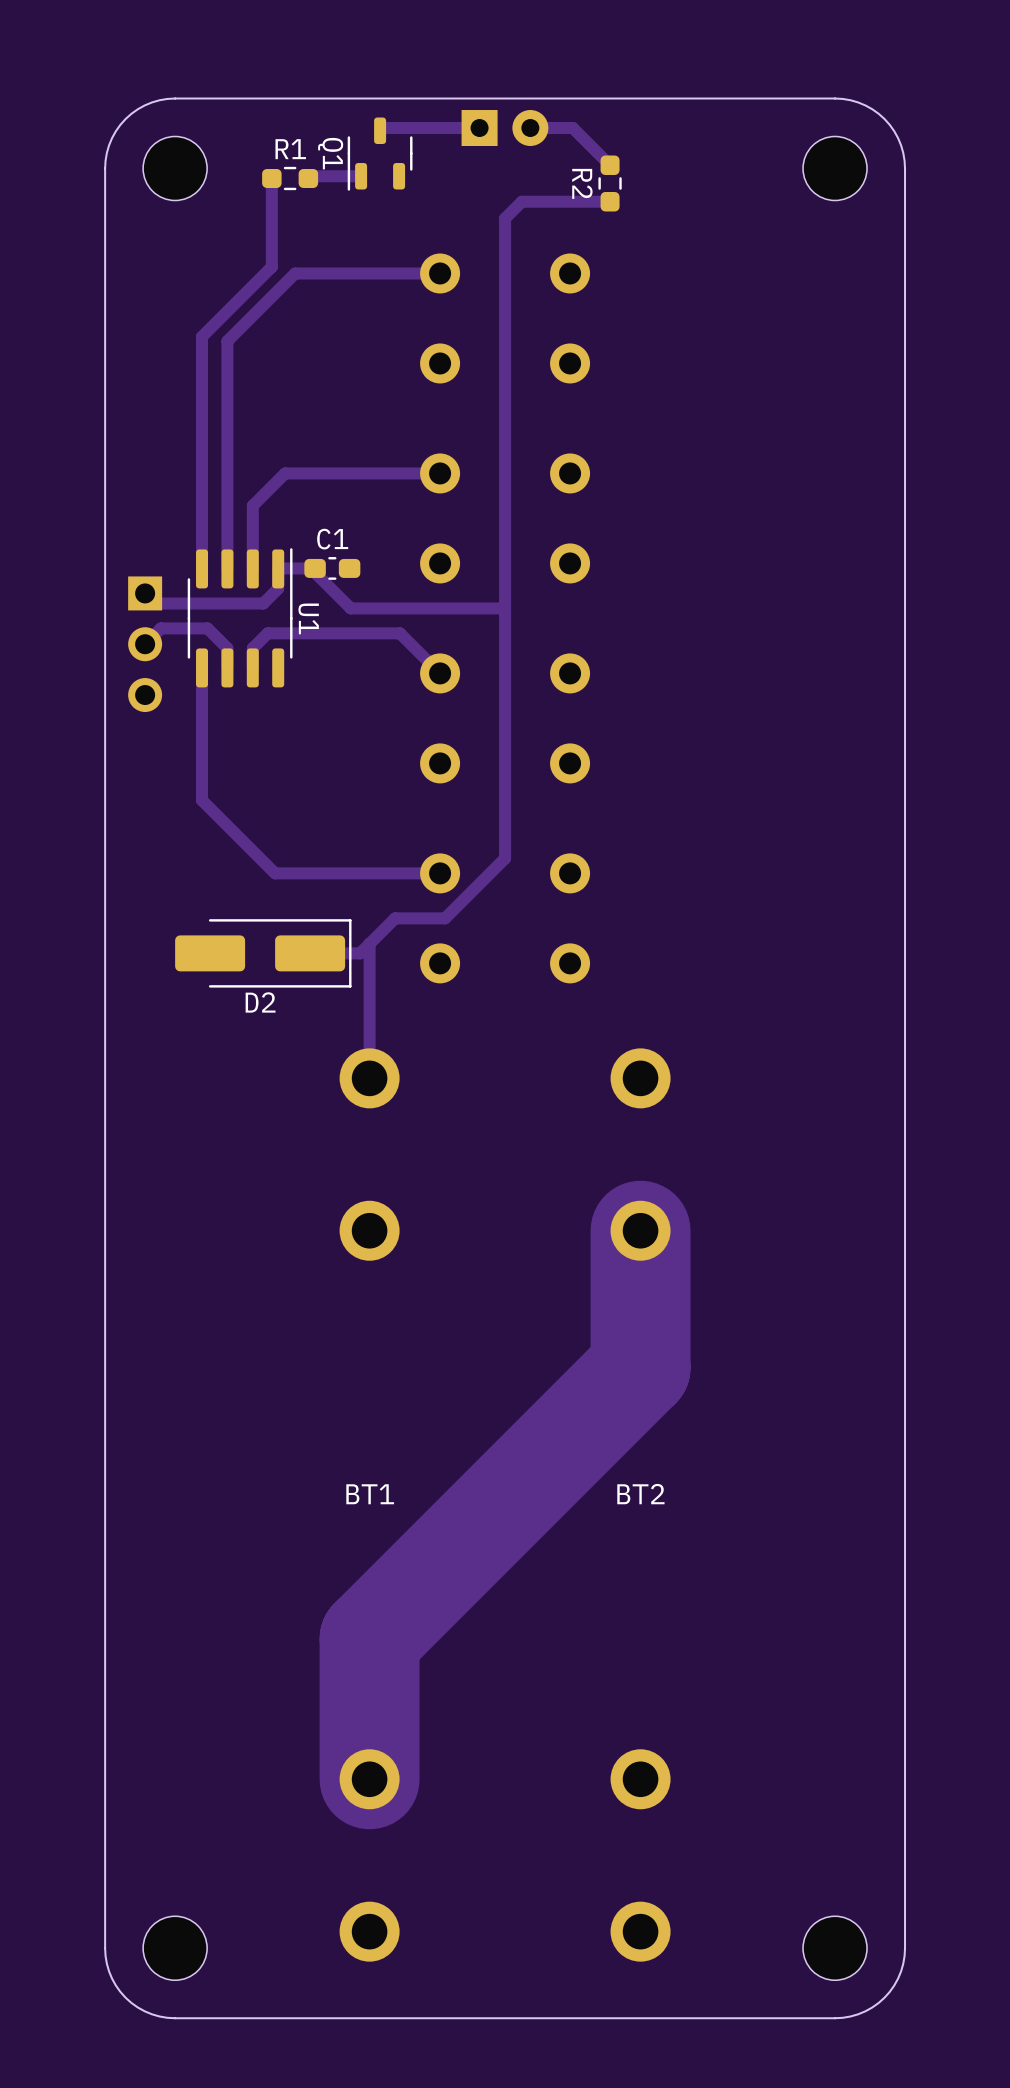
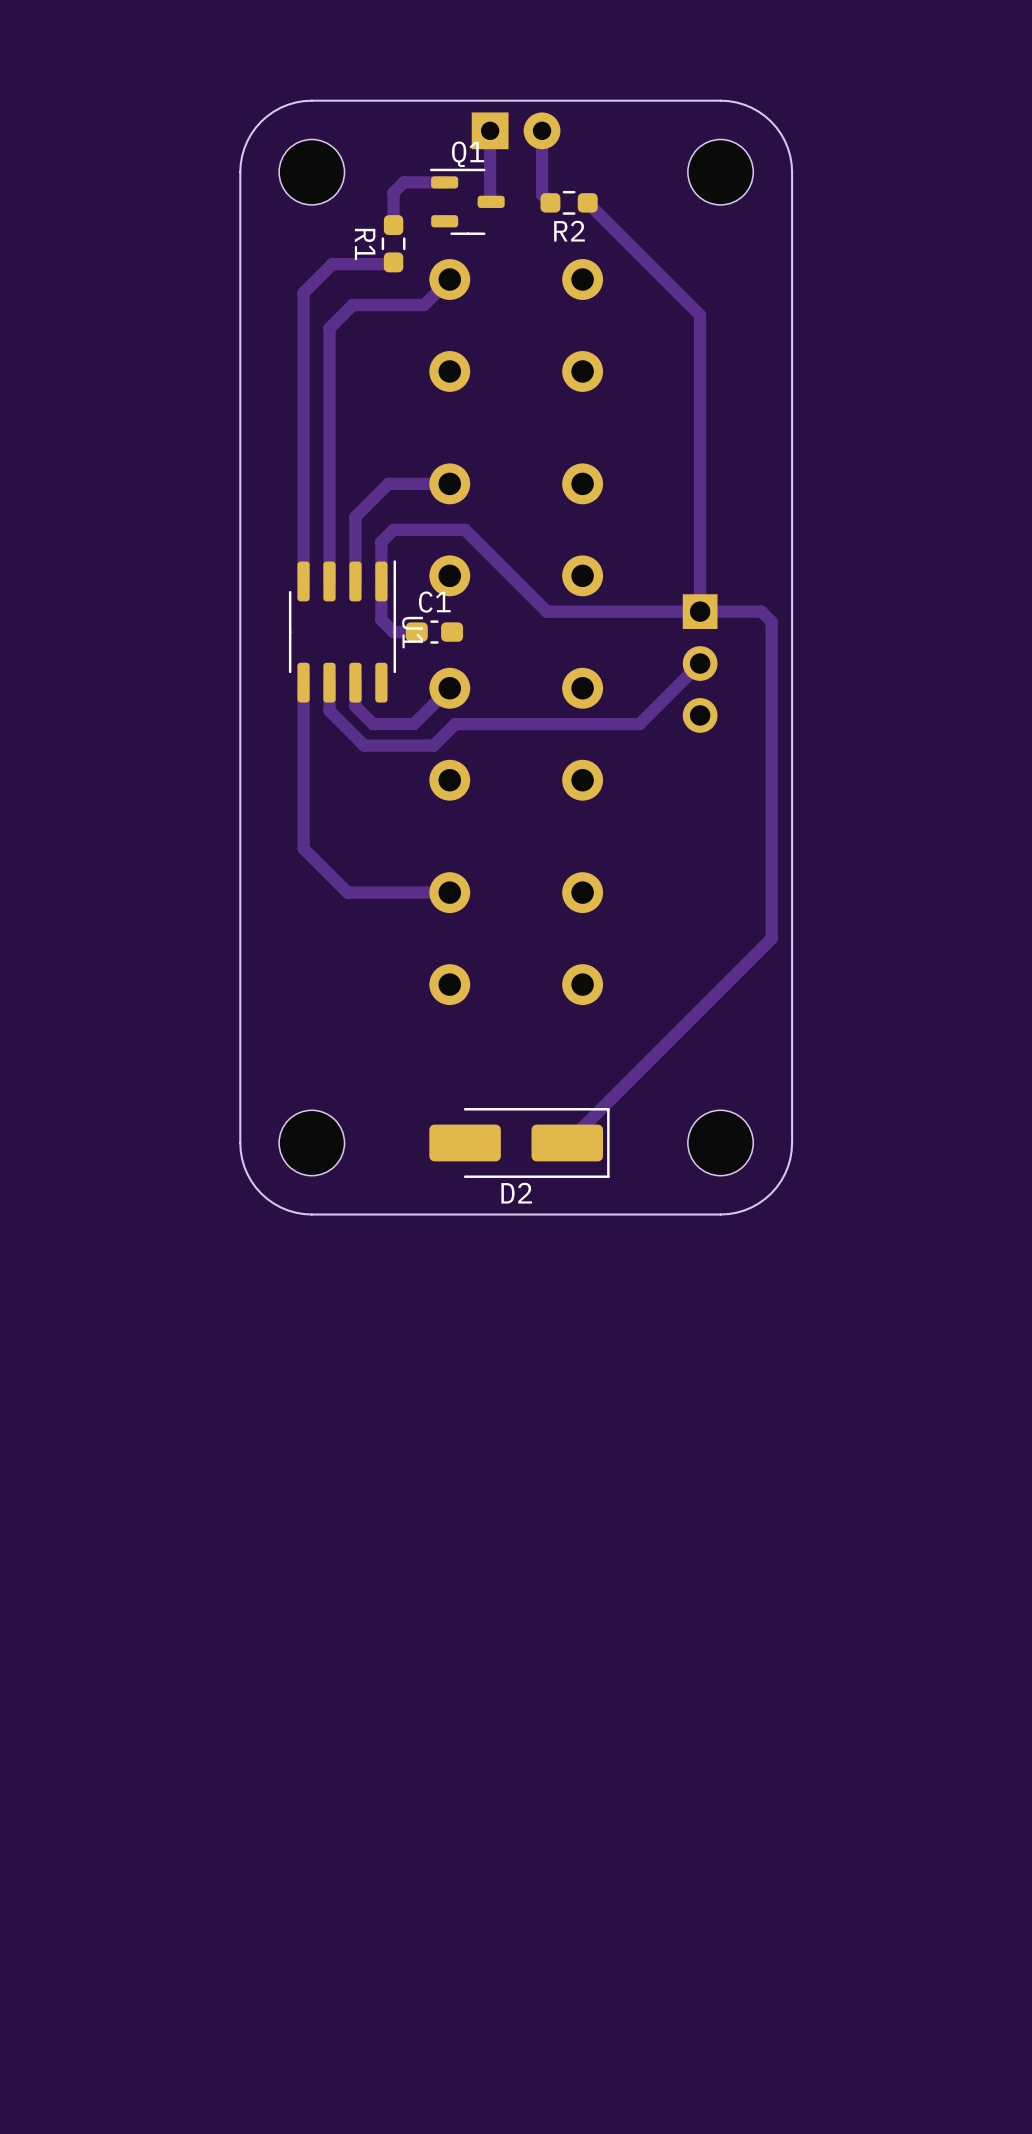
board edge: (705, 98) (835, 98) (858, 102) (878, 113) (889, 124) (901, 145) (904, 160) (905, 1948) (903, 1963) (894, 1985) (884, 1997) (865, 2011) (842, 2017) (167, 2017) (144, 2011) (125, 1997) (115, 1985) (109, 1971) (105, 1948) (105, 160) (109, 145) (120, 124) (131, 113) (152, 102) (175, 98) (305, 98) -> (720, 100) (744, 104) (758, 111) (771, 121) (785, 141) (790, 156) (792, 172) (791, 1151) (788, 1166) (781, 1181) (765, 1198) (744, 1210) (720, 1214) (303, 1214) (288, 1210) (267, 1198) (251, 1181) (244, 1166) (240, 1142) (240, 164) (247, 141) (255, 127) (267, 116) (288, 104) (311, 100)
track: (479, 128) (382, 128) (380, 130) -> (490, 130) (491, 201)
track: (530, 128) (572, 128) (610, 165) -> (542, 130) (542, 194) (550, 202)
R1 name position: R1 (290, 149) -> R1 (365, 244)
Q1 rotation: 0° (380, 154) -> 90° clockwise (467, 201)
Q1 position: (380, 154) -> (467, 201)
part position: (175, 168) -> (311, 172)
part position: (835, 168) -> (720, 172)
track: (361, 176) (310, 176) (308, 178) -> none
track: (271, 178) (271, 266) (202, 336) (202, 568) -> none
R1 rotation: 0° (290, 178) -> 90° clockwise (393, 243)
R1 position: (290, 178) -> (393, 243)
track: none -> (444, 182) (403, 182) (393, 192) (393, 225)
R2 name position: R2 (582, 183) -> R2 (569, 231)
R2 rotation: 0° (610, 183) -> 90° clockwise (569, 202)
R2 position: (610, 183) -> (569, 202)
track: none -> (587, 202) (700, 315) (700, 611)
track: (610, 201) (521, 201) (505, 218) (505, 858) (445, 918) (395, 918) (360, 953) (310, 953) -> none
track: none -> (393, 262) (391, 264) (332, 264) (303, 292) (303, 581)
track: (440, 273) (295, 273) (227, 341) (227, 568) -> (449, 279) (424, 305) (352, 305) (329, 328) (329, 581)
track: (380, 473) (285, 473) (252, 505) (252, 568) -> (388, 483) (355, 516) (355, 581)
C1 position: (332, 568) -> (434, 632)
track: (145, 593) (155, 603) (263, 603) (278, 588) (278, 568) (315, 568) (315, 572) (350, 608) (505, 608) -> none
U1 position: (240, 617) -> (342, 631)
track: none -> (416, 632) (393, 632) (381, 619) (381, 542) (393, 529) (465, 529) (546, 611) (761, 611) (771, 621) (771, 938) (567, 1142)
track: (145, 644) (160, 628) (207, 628) (227, 648) (227, 667) -> none
part: (145, 644) -> none
track: none -> (700, 663) (639, 724) (455, 724) (433, 745) (364, 745) (329, 710) (329, 682)
part: none -> (700, 663)
track: (202, 667) (202, 800) (275, 873) (340, 873) -> (303, 682) (303, 848) (347, 892)
track: (252, 667) (252, 648) (267, 633) (400, 633) (440, 673) -> (355, 682) (355, 706) (373, 724) (414, 724) (449, 688)
track: (369, 943) (369, 1078) -> none
D2 position: (263, 953) -> (519, 1142)
part: none -> (311, 1142)
part: none -> (720, 1142)
track: (640, 1230) (640, 1367) (369, 1638) (369, 1779) -> none
BT1: (369, 1505) -> none
BT2: (640, 1505) -> none
part: (175, 1948) -> none
part: (835, 1948) -> none

